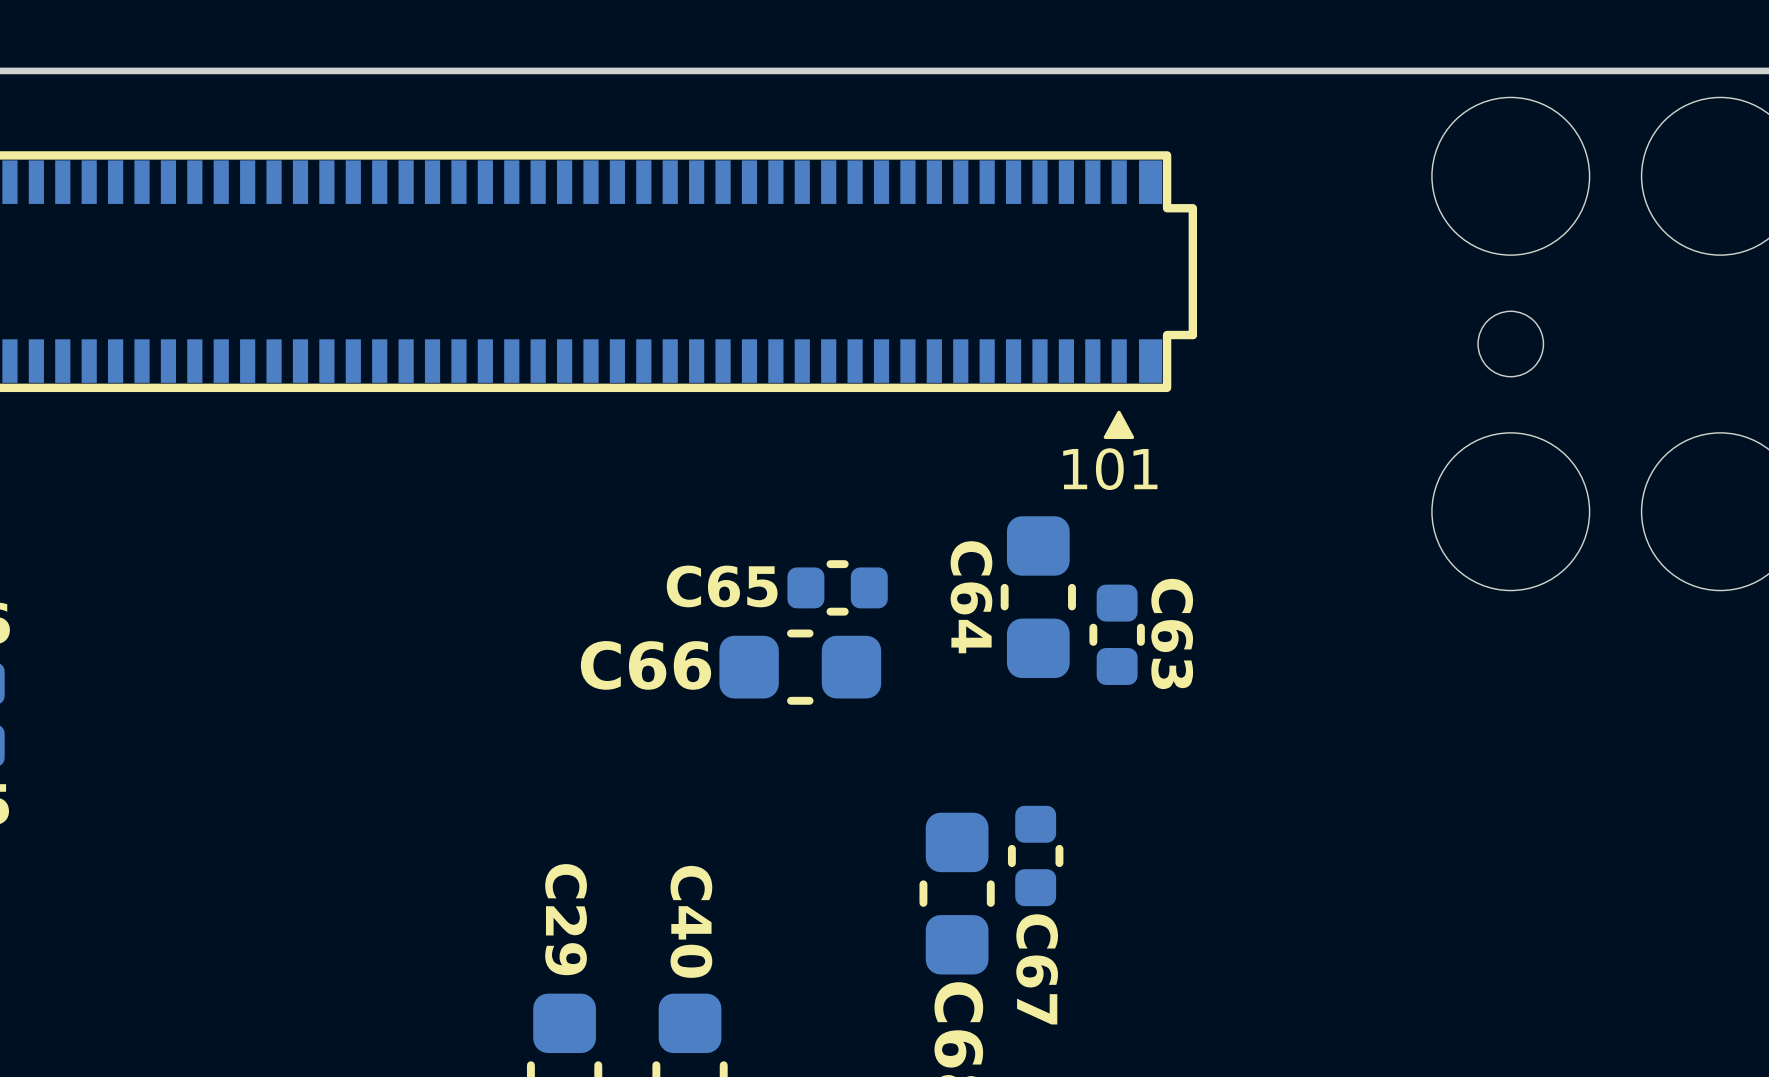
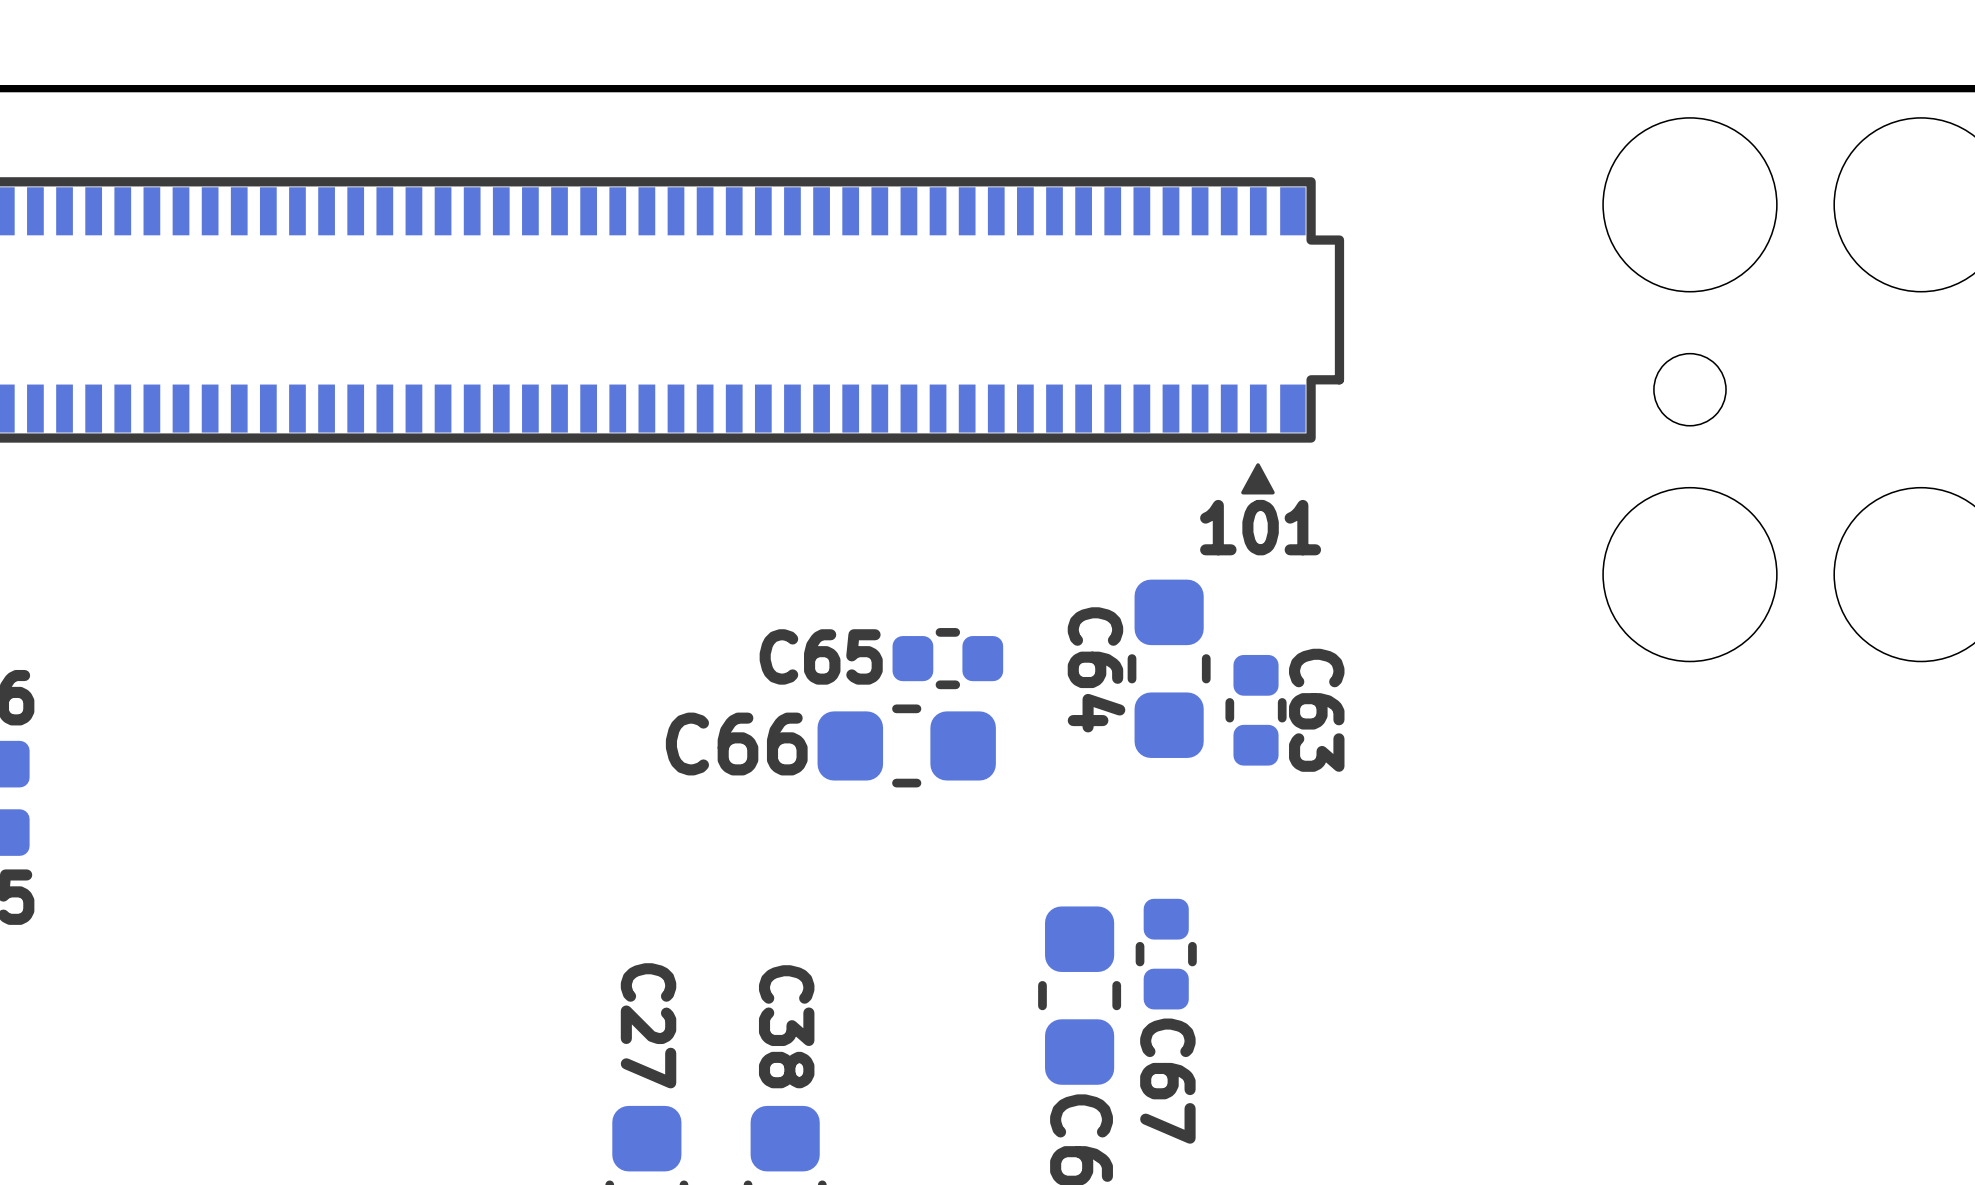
C29 name: C29 (566, 919) -> C27 (648, 1025)
C40 name: C40 (691, 921) -> C38 (786, 1026)

